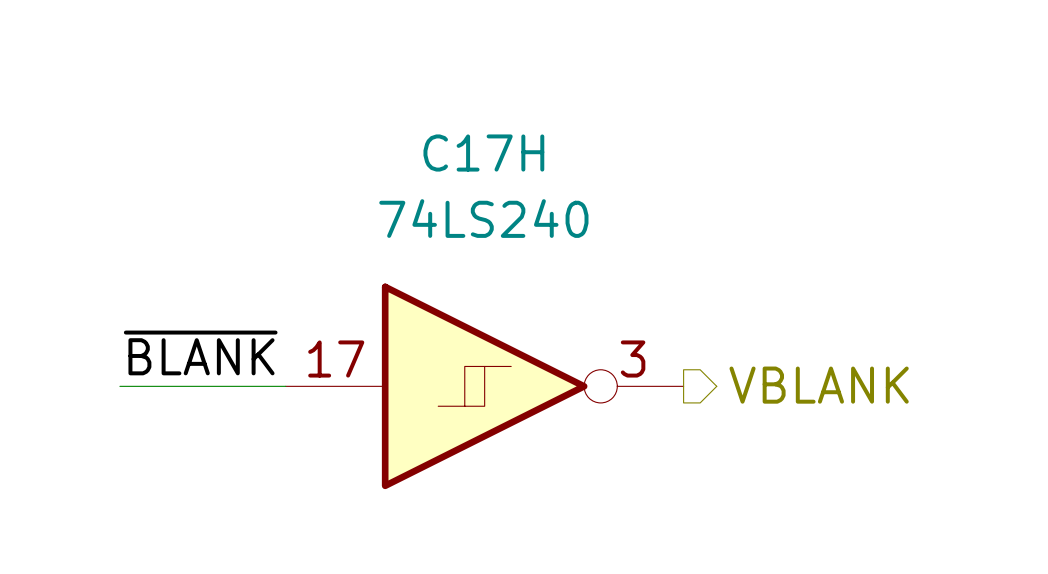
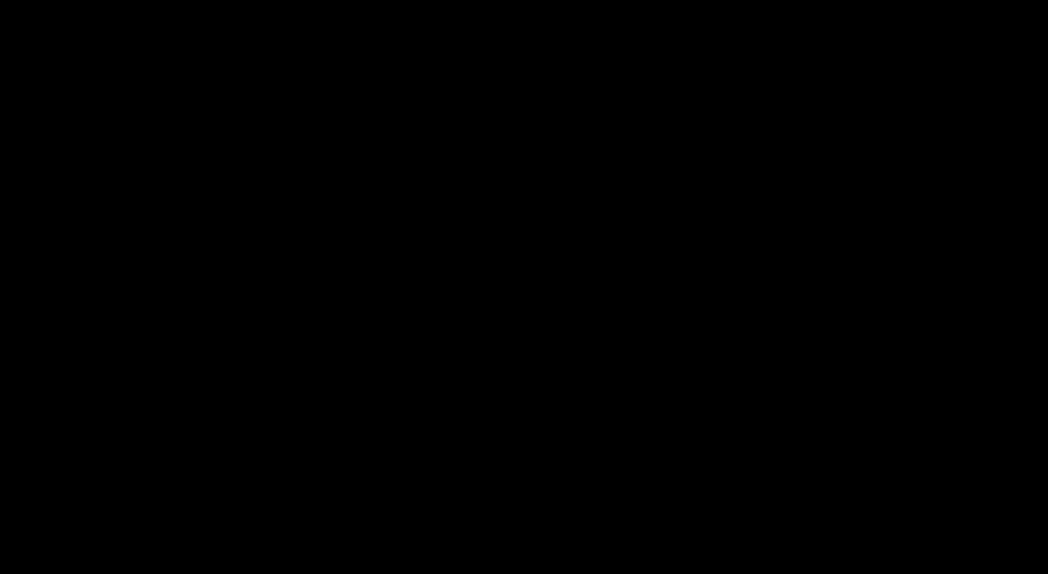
label: ~{BLANK} (200, 352) -> none
hierarchical label: VBLANK (819, 385) -> none
wire: (119, 386) (285, 386) -> none
C17H: 74LS240 (484, 386) -> none

